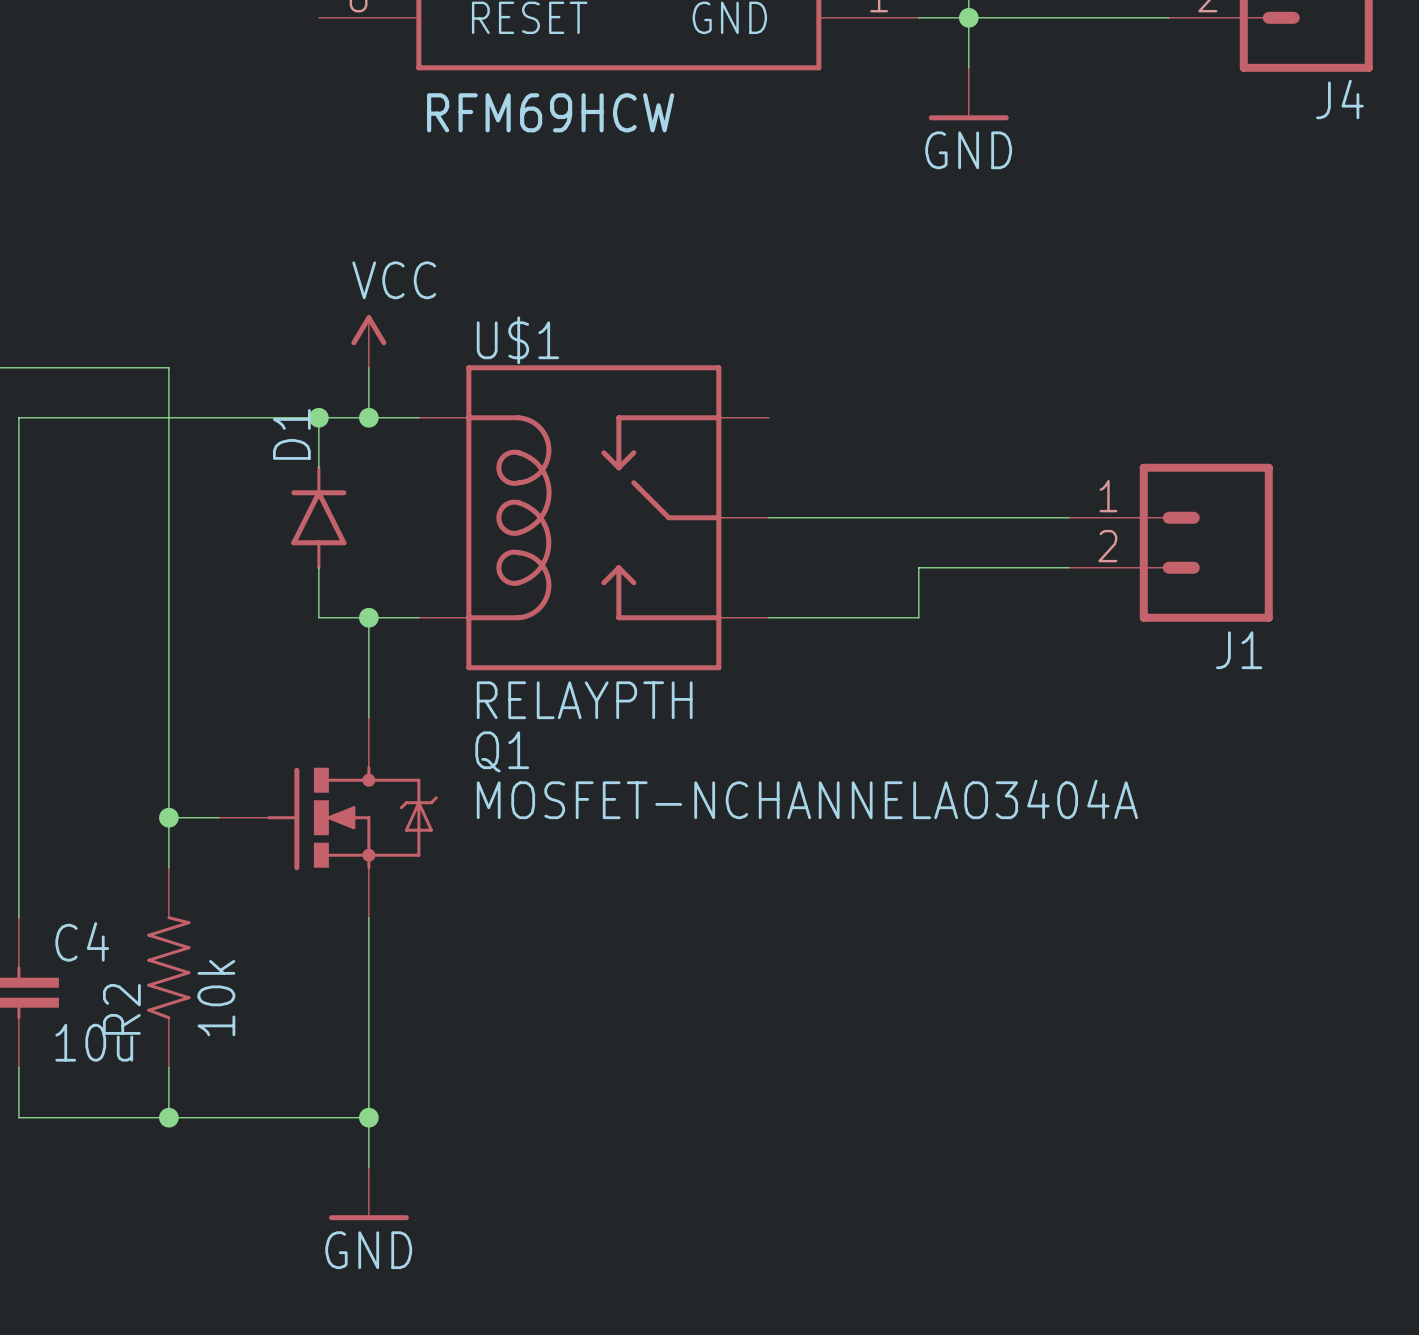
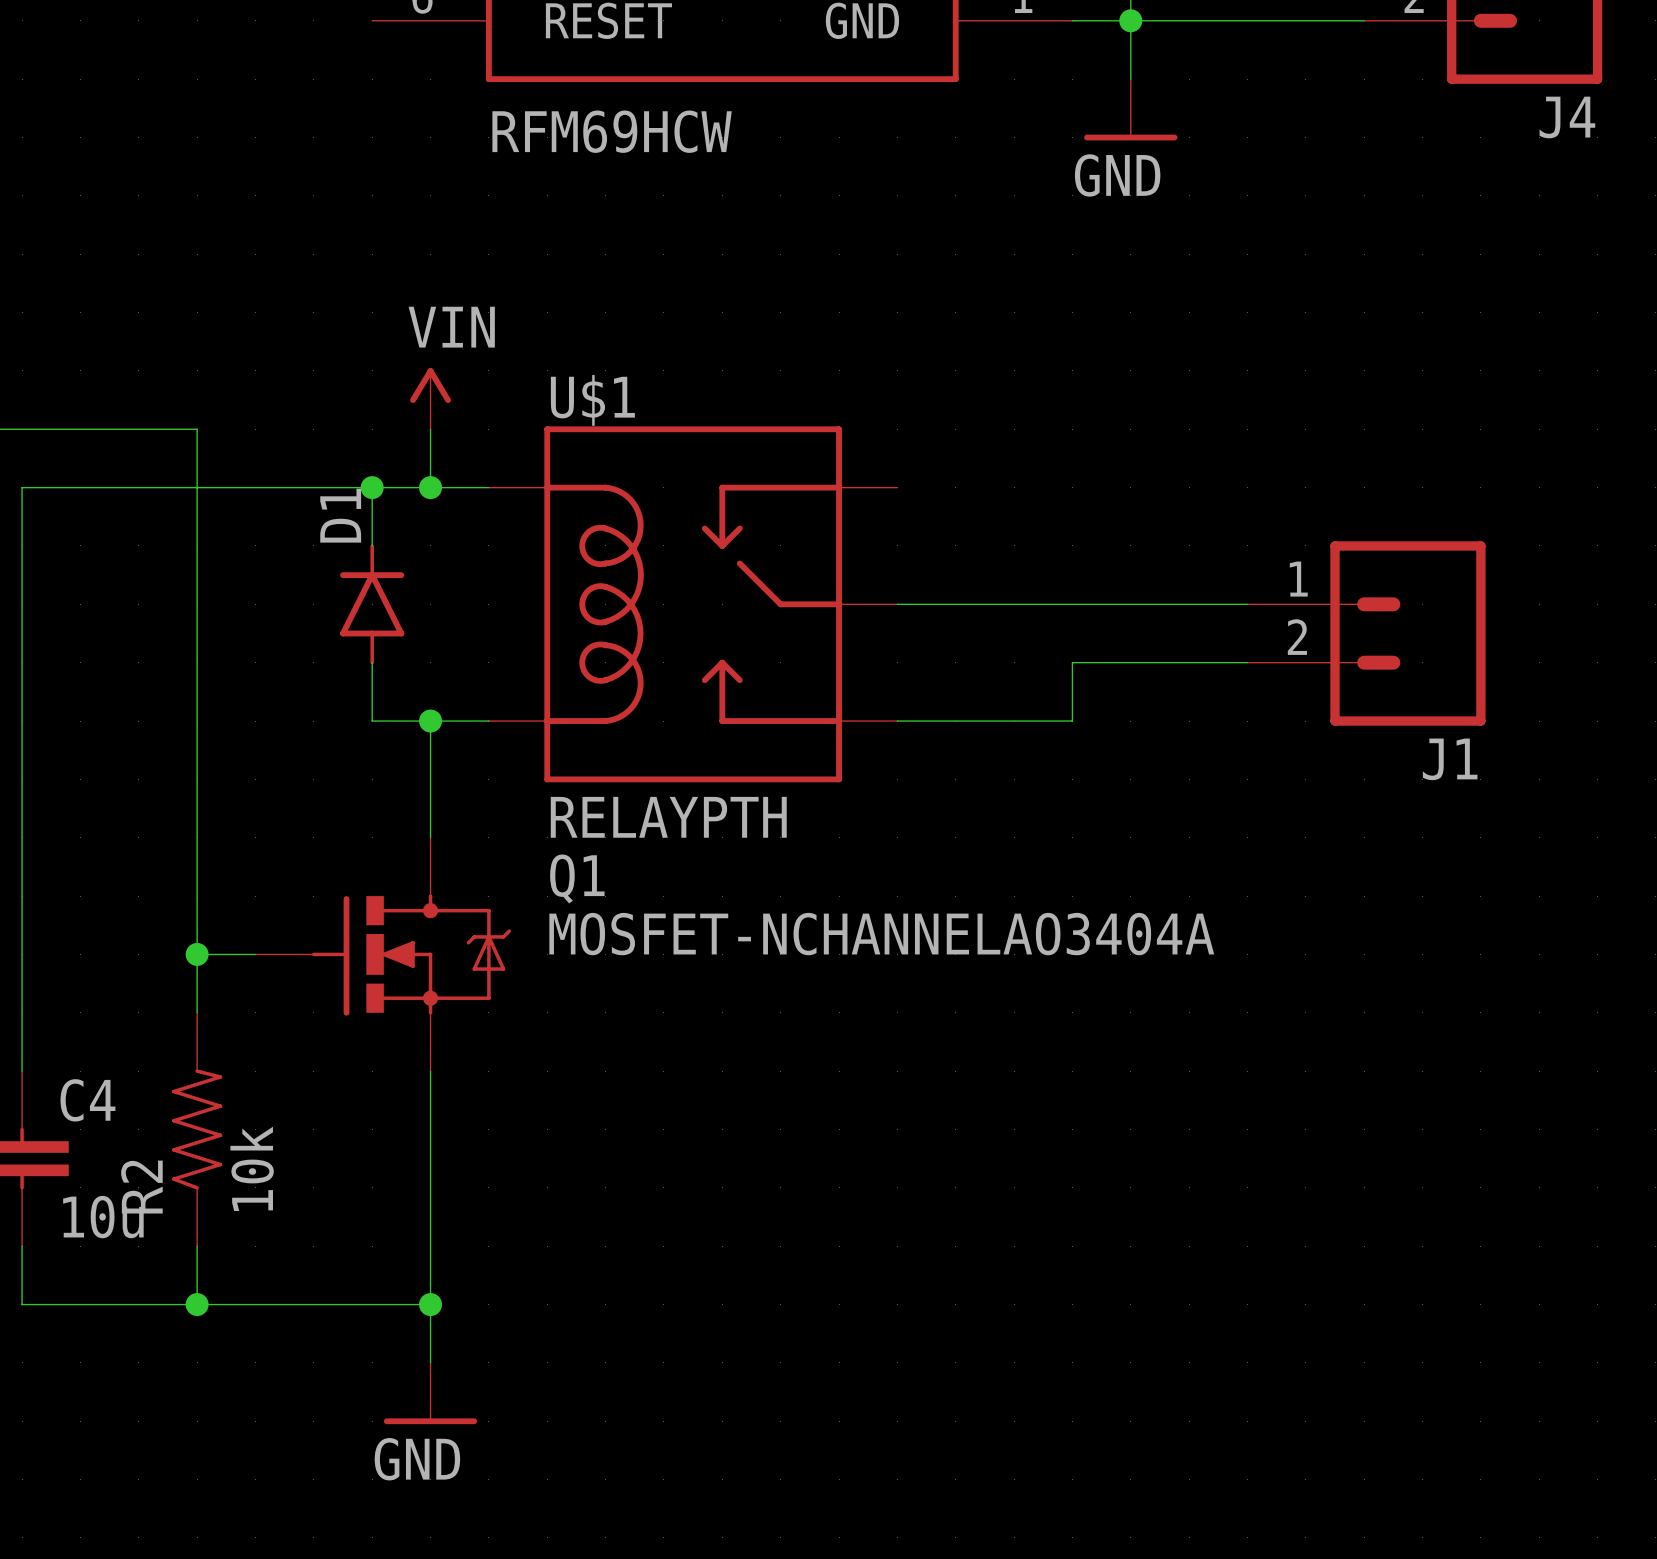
power symbol: VCC (368, 341) -> VIN (430, 398)

